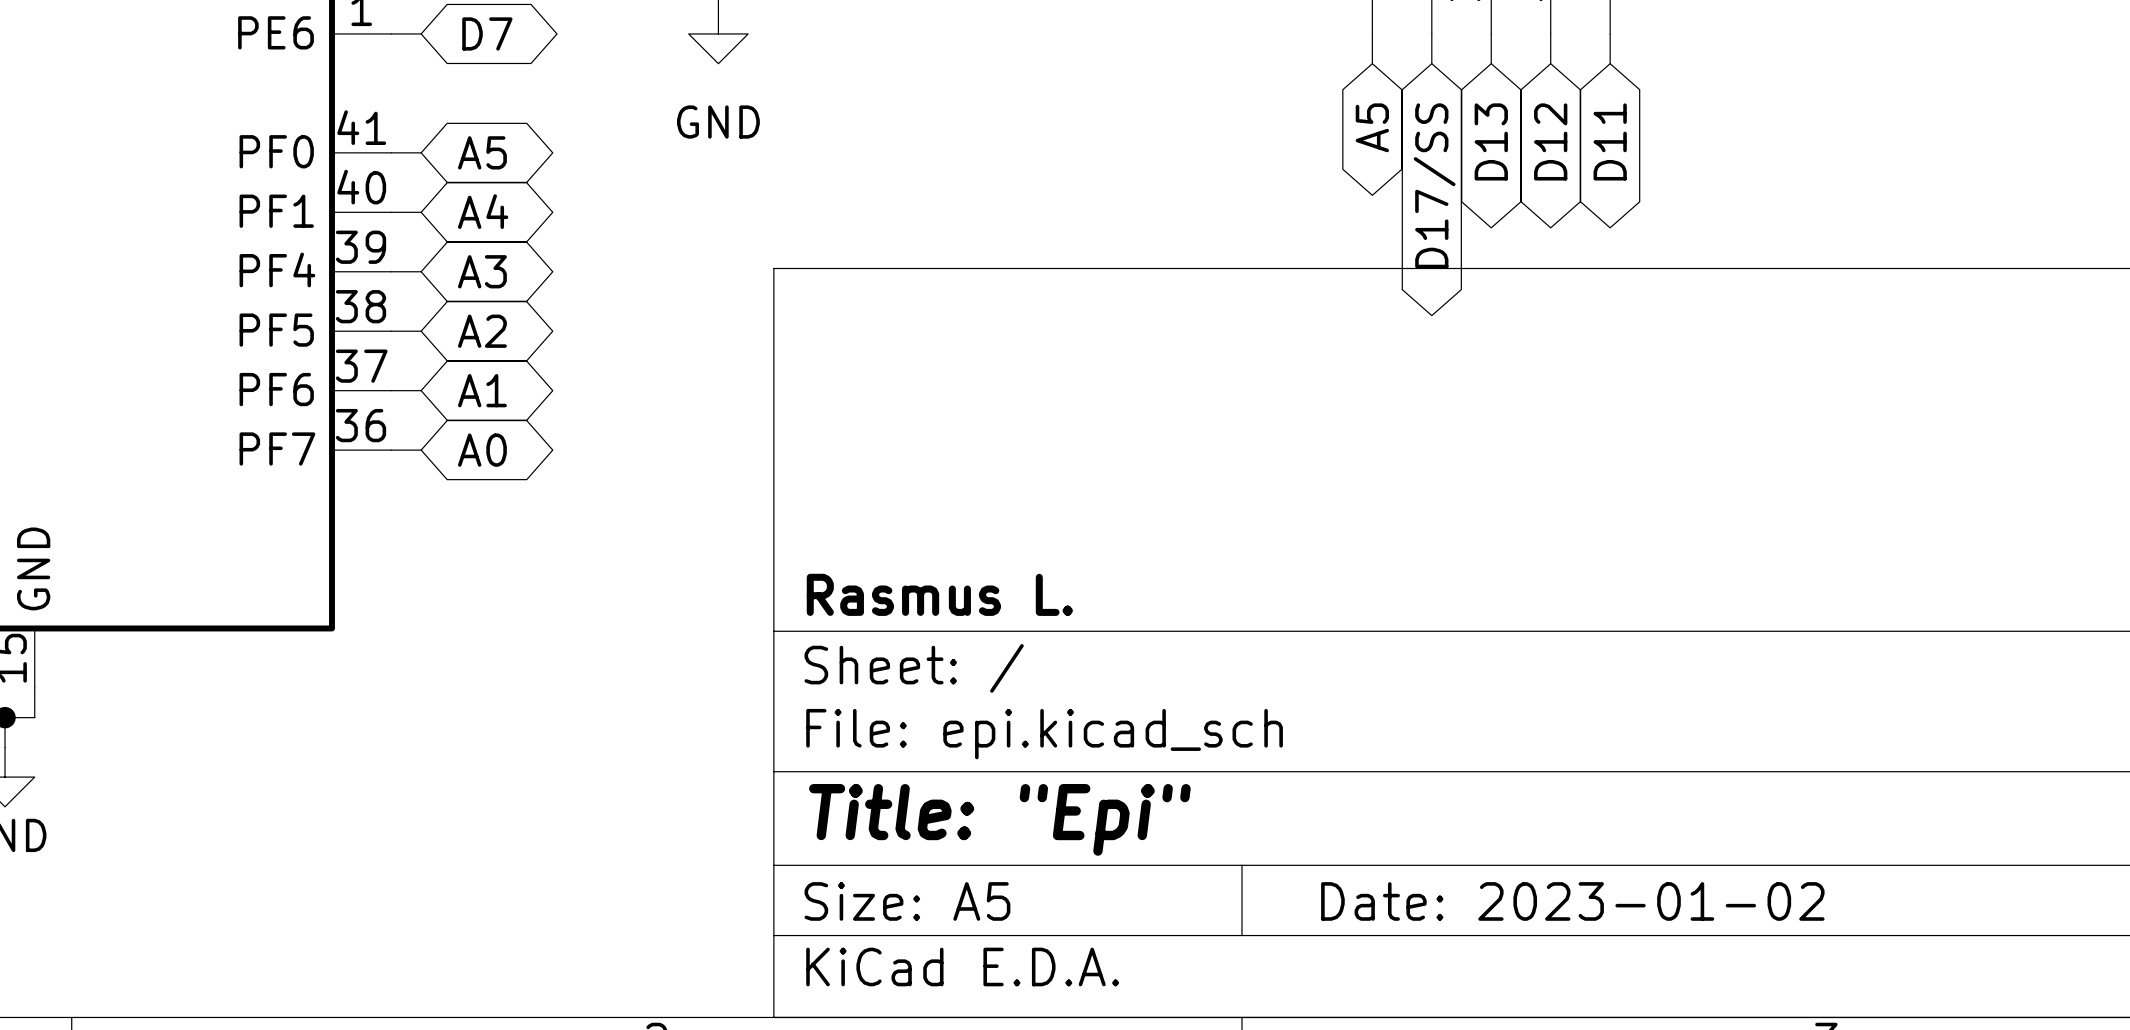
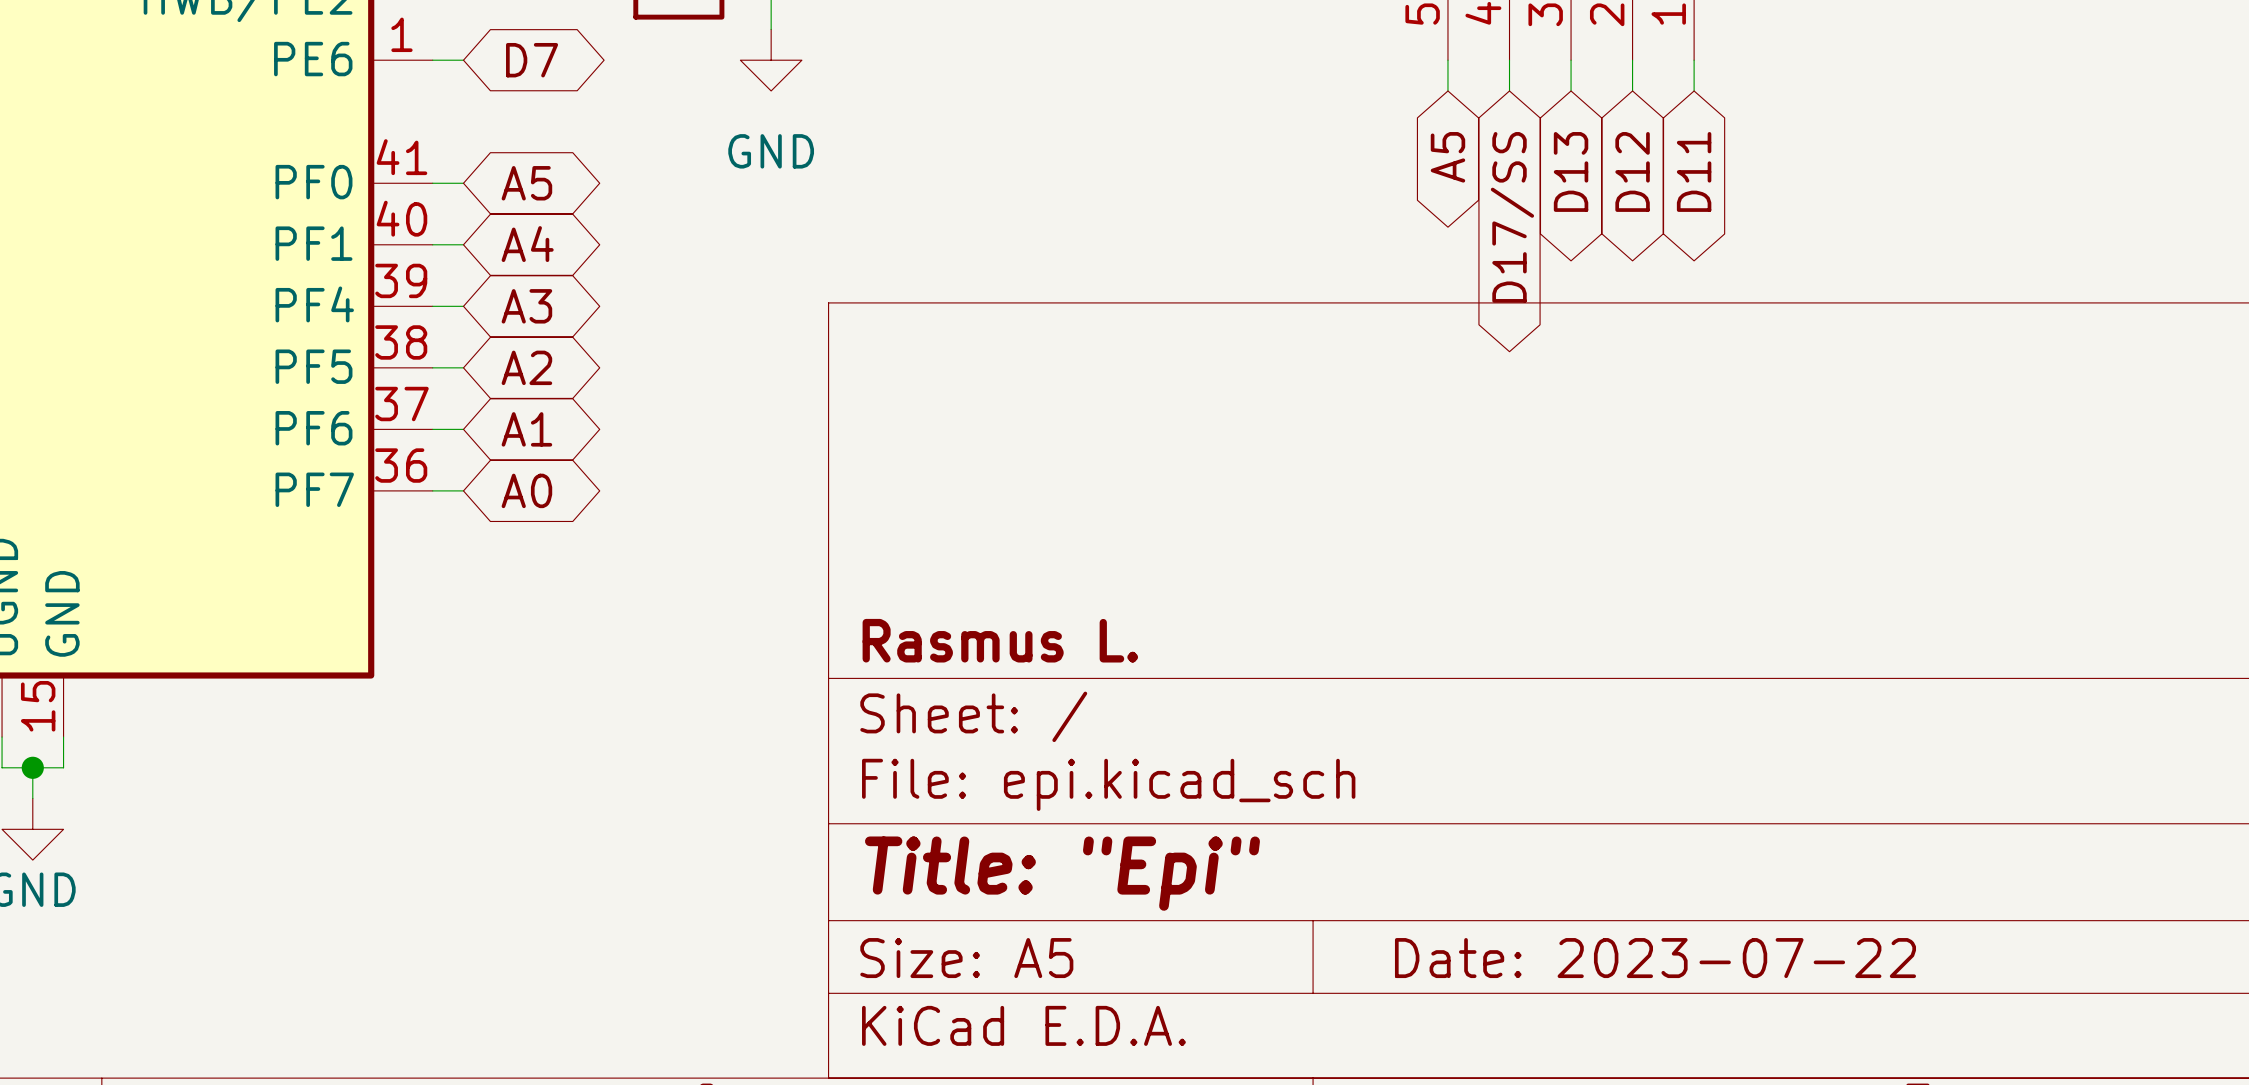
title block: Date: 2023-01-02 (1572, 901) -> Date: 2023-07-22 (1655, 958)

